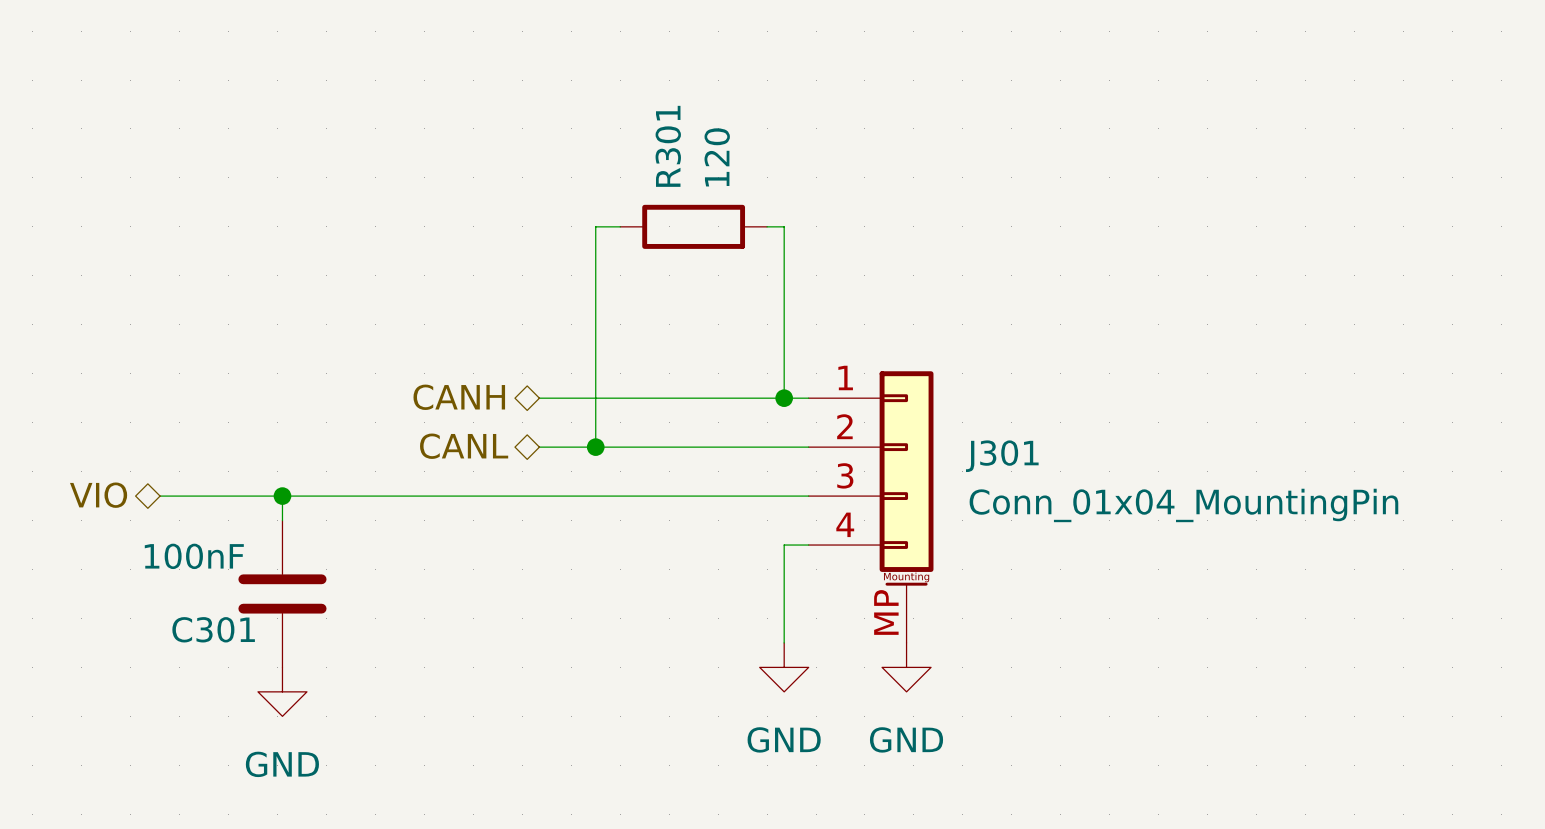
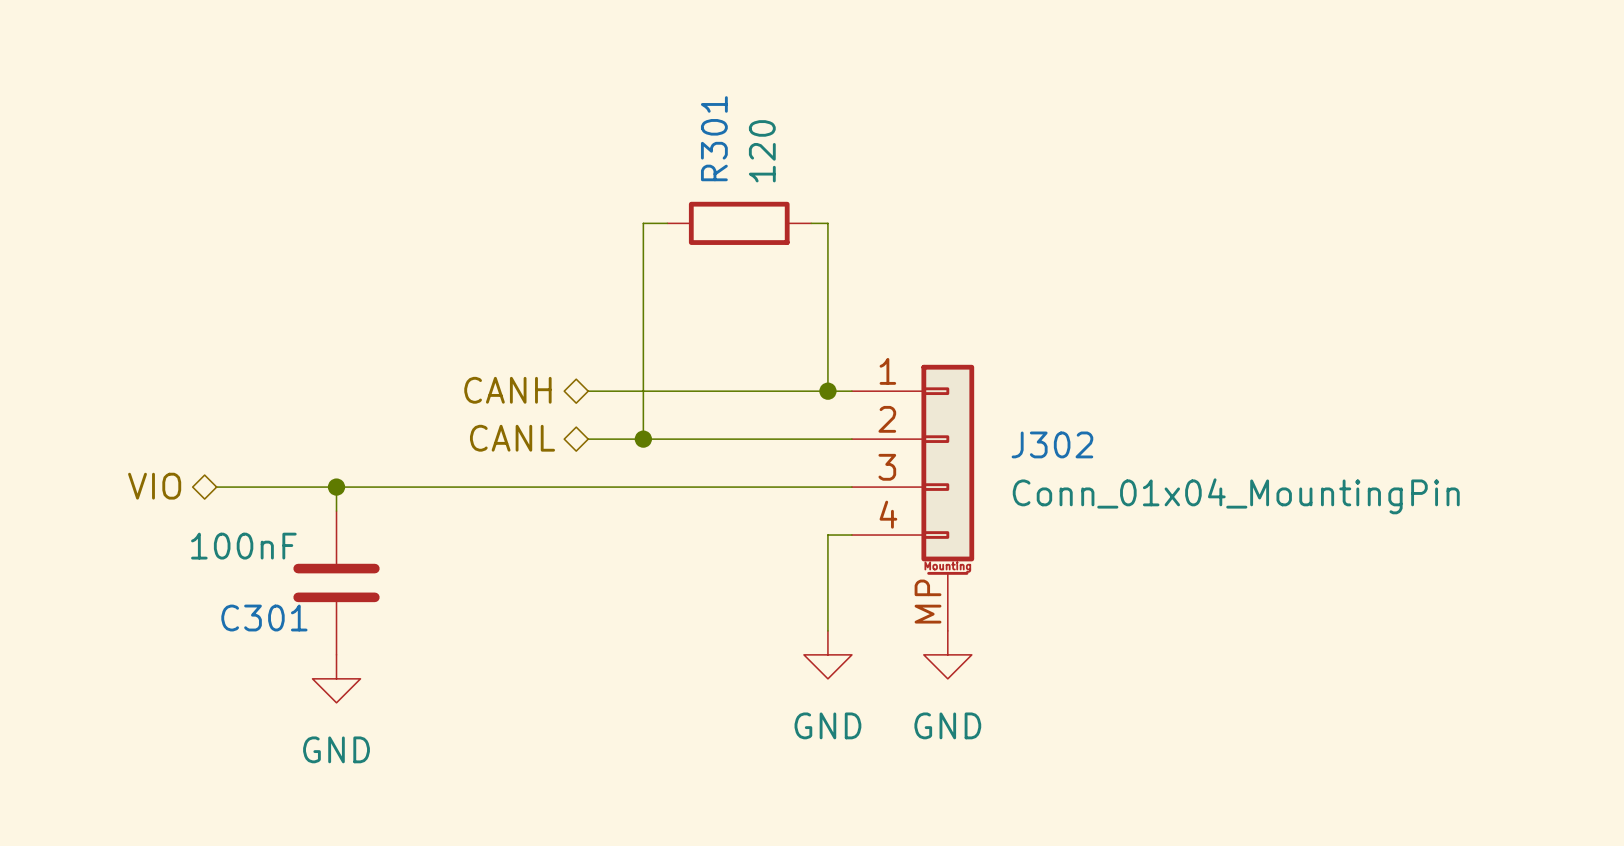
J301 name: J301 (1002, 456) -> J302 (1052, 444)

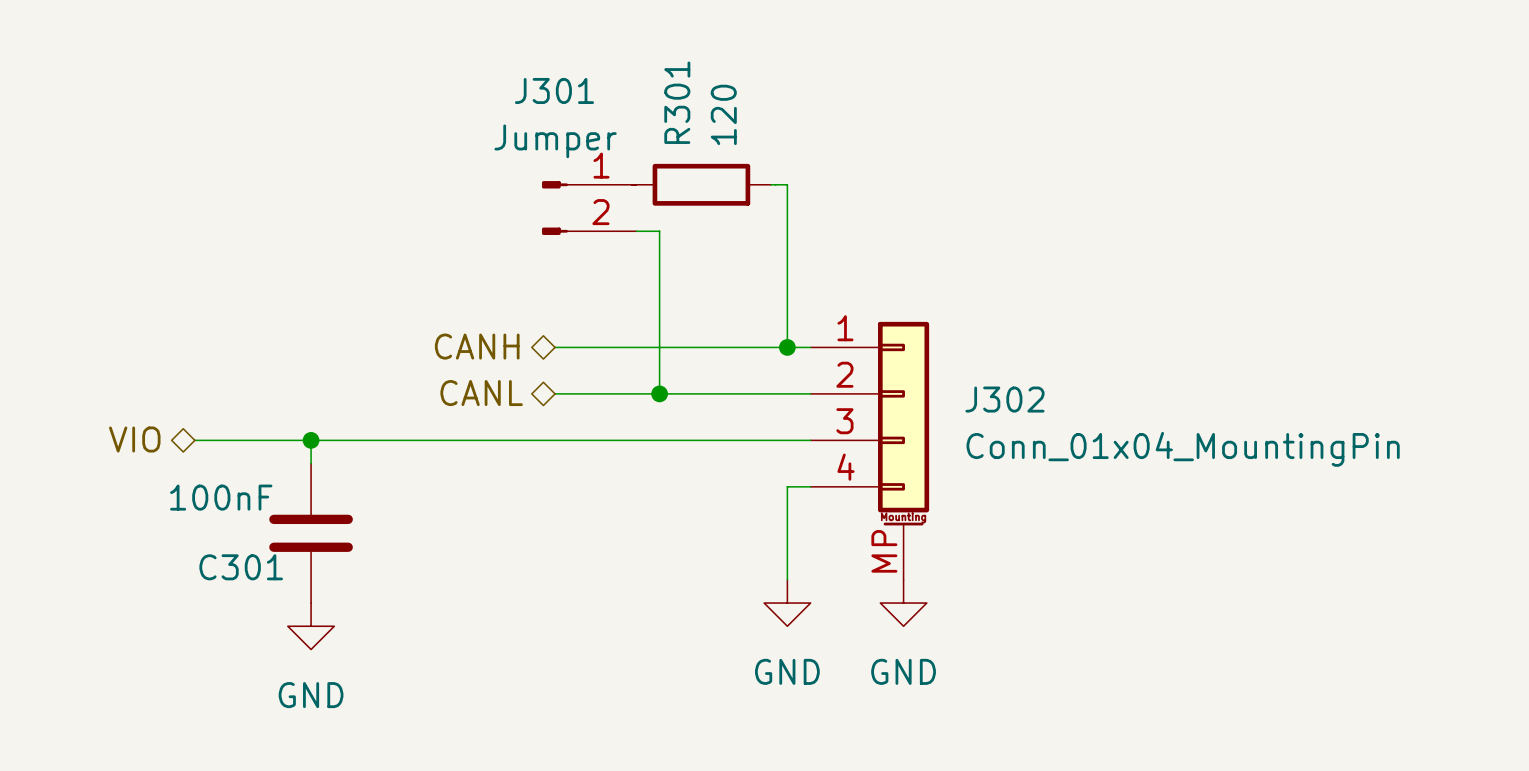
wire: (667, 223) (643, 223) (643, 439) -> none
J301: none -> Jumper (589, 208)
wire: none -> (636, 231) (659, 231) (659, 393)
junction position: (643, 439) -> (659, 393)

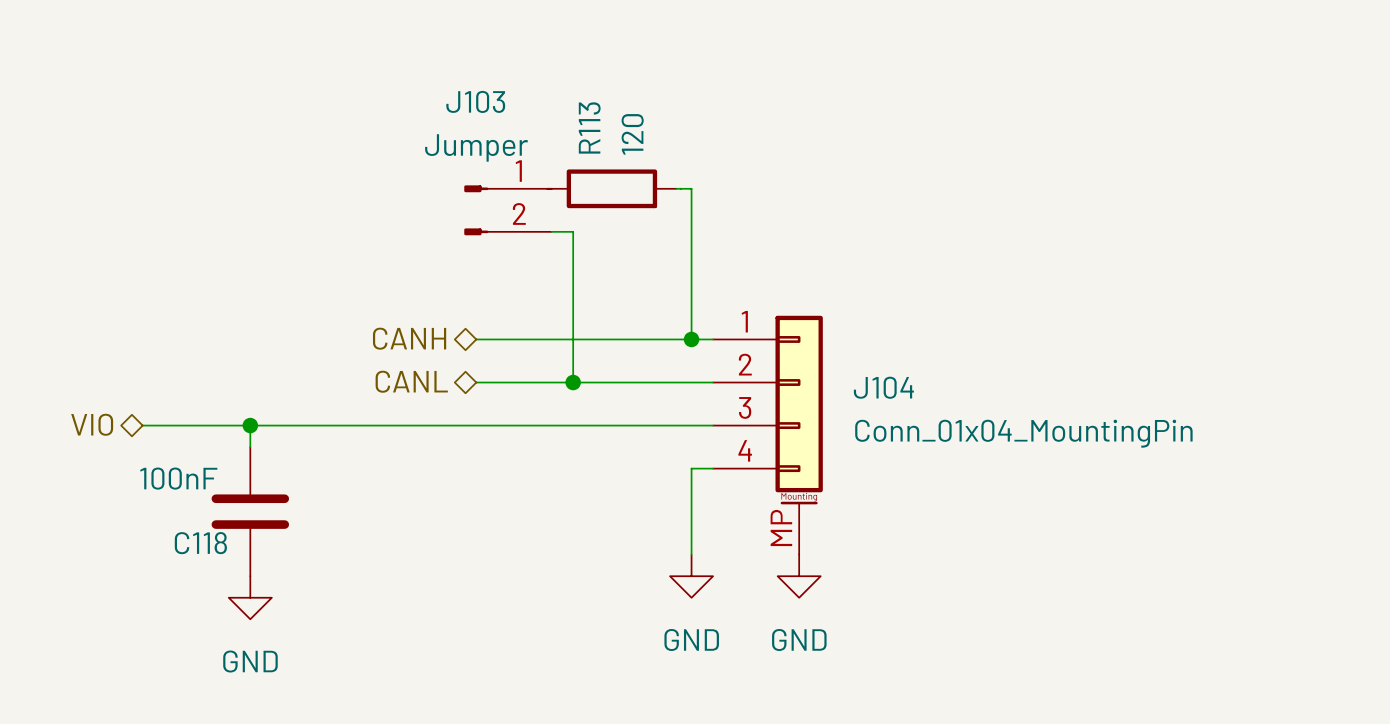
J301 name: J301 (554, 90) -> J103 (475, 101)
R301 name: R301 (677, 102) -> R113 (589, 127)
J302 name: J302 (1004, 399) -> J104 (883, 387)
C301 name: C301 (241, 567) -> C118 (200, 543)

